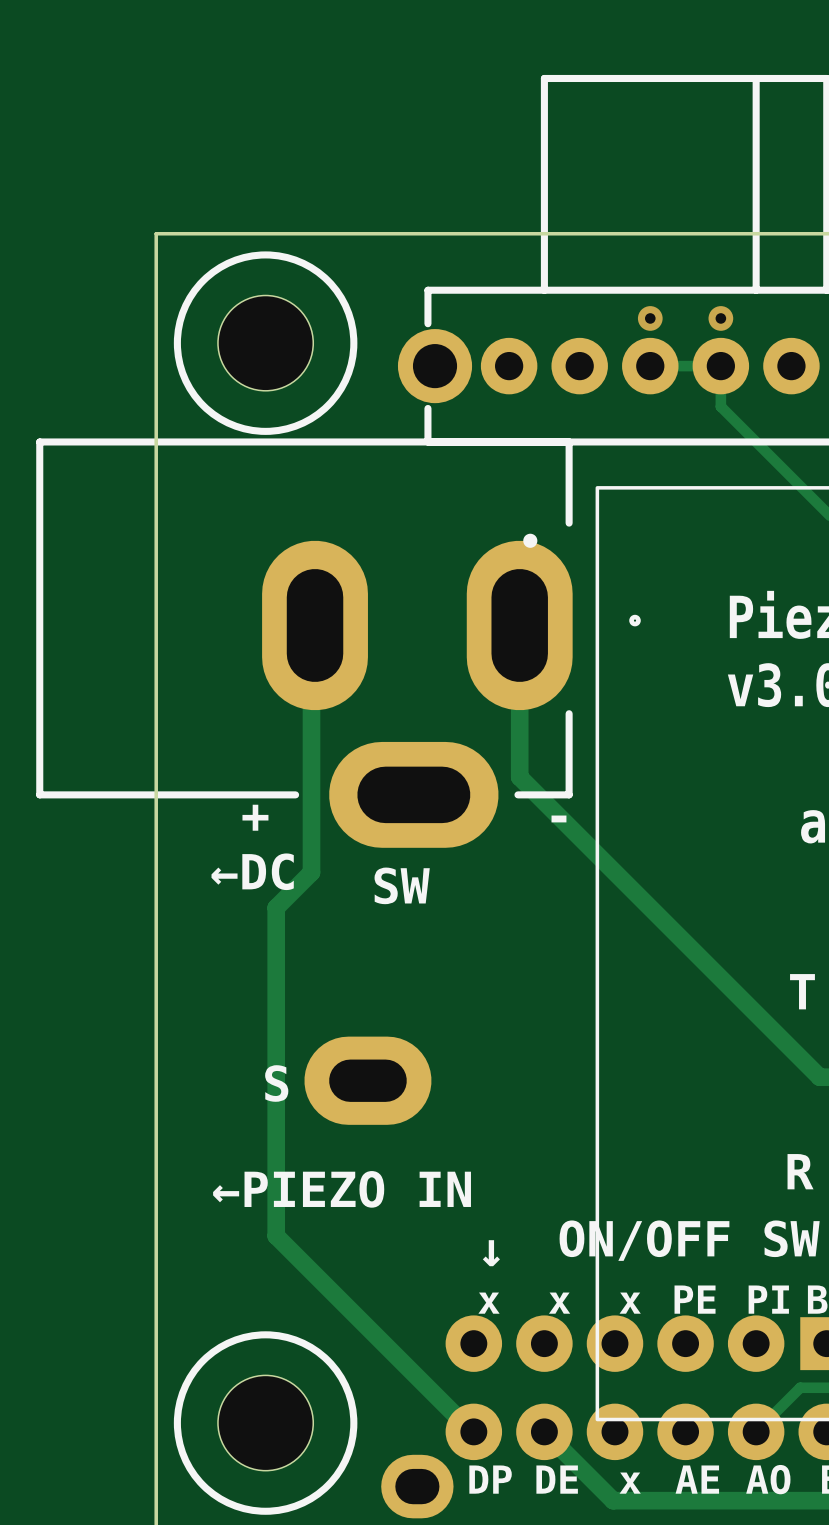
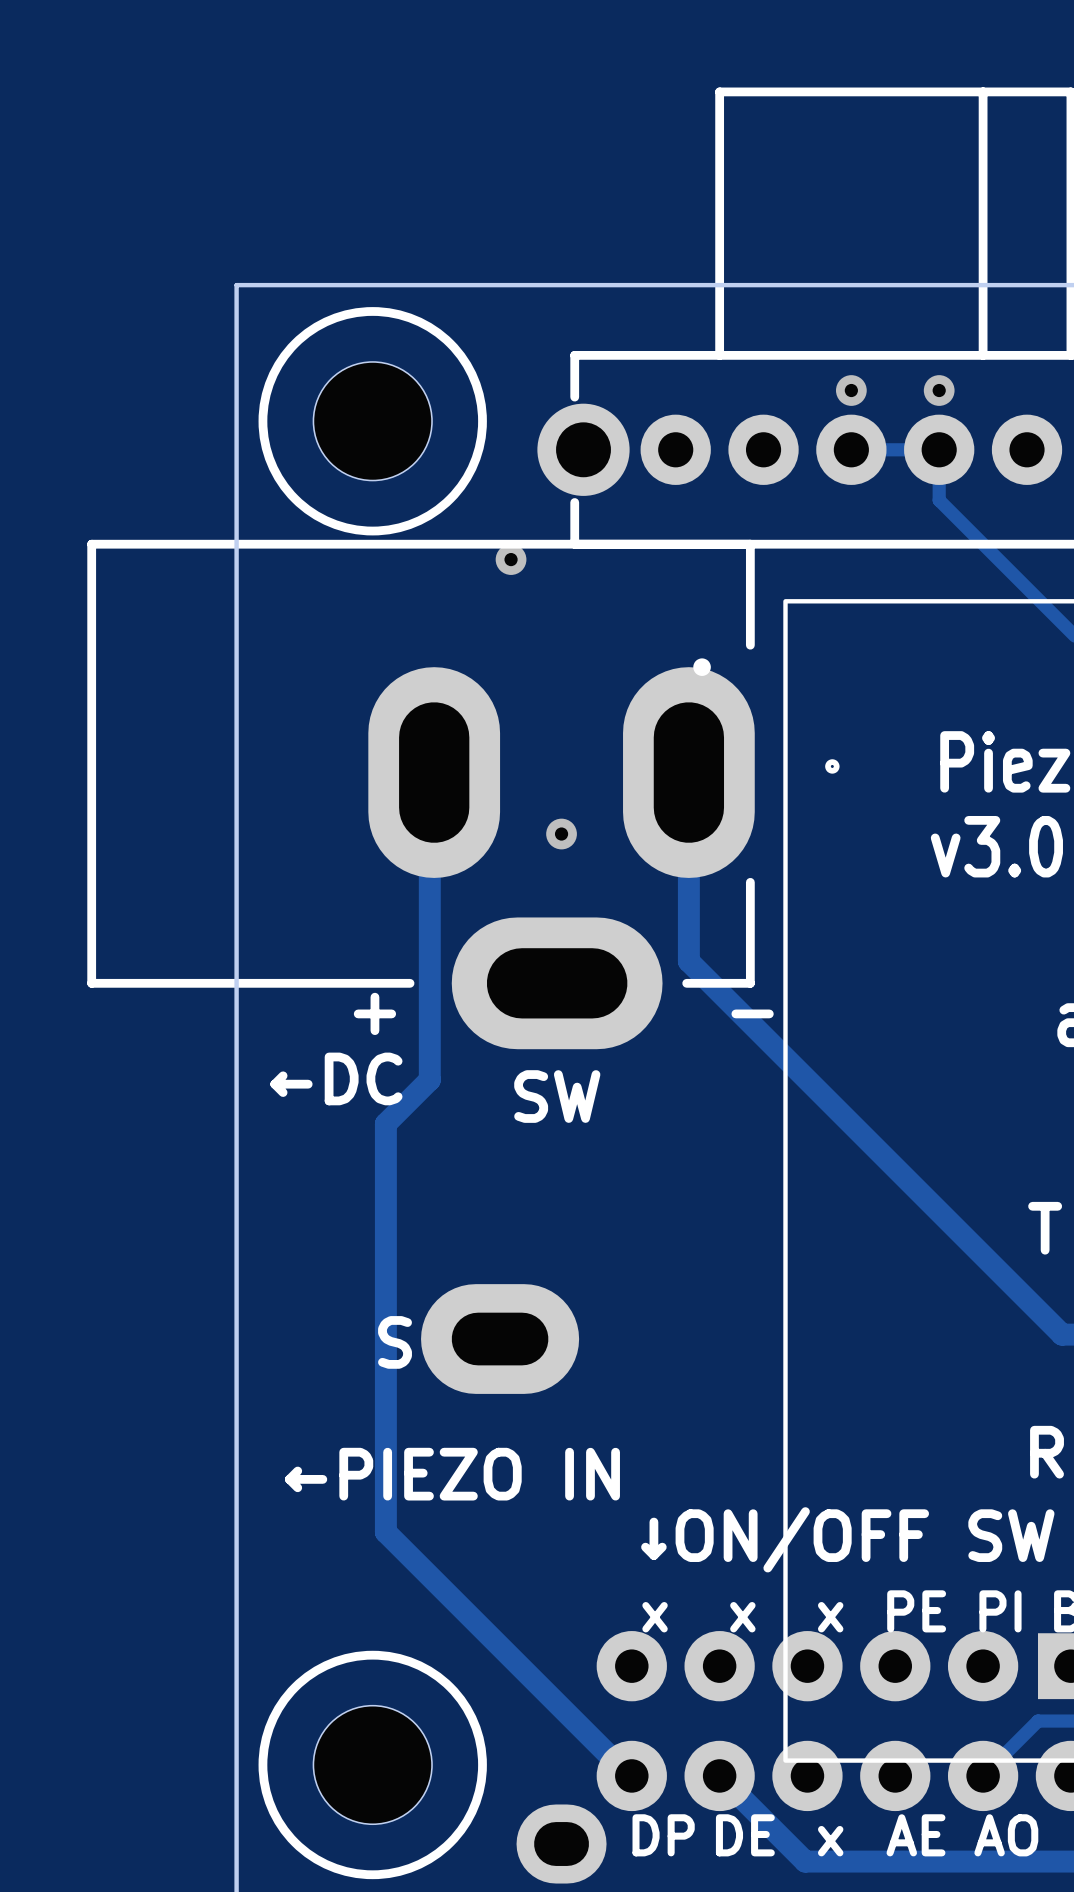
via: none -> (511, 559)
via: none -> (561, 834)

